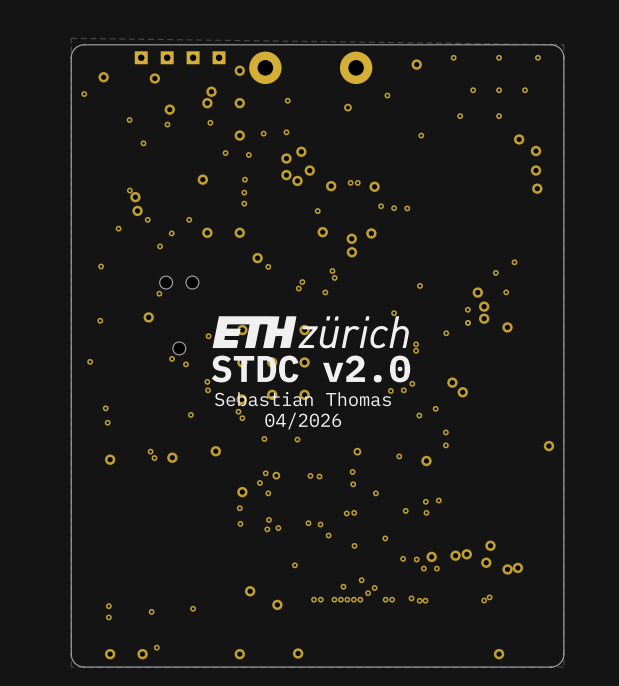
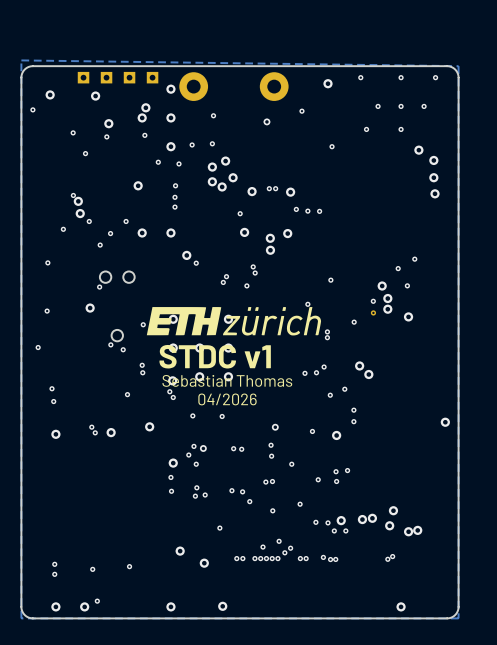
text: STDC v2.0 (310, 368) -> STDC v1 (215, 356)

